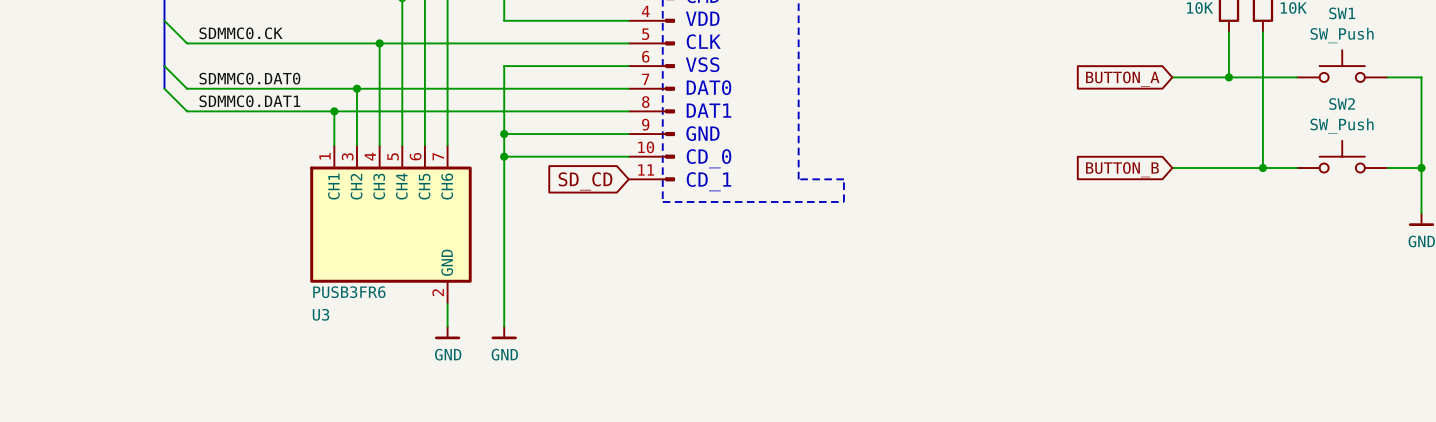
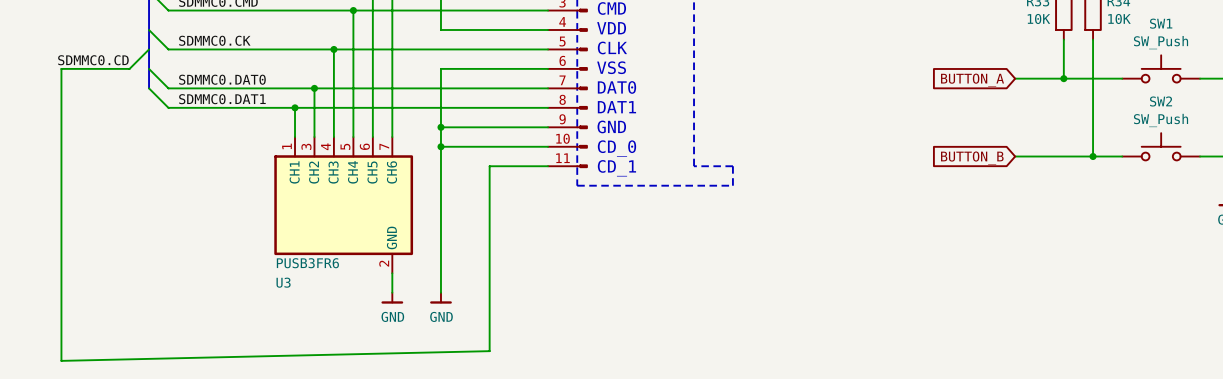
wire: none -> (149, 49) (129, 68) (61, 68) (61, 360) (489, 351) (489, 166) (548, 166)
label: none -> SDMMC0.CD (93, 60)
global label: SD_CD (585, 181) -> none

